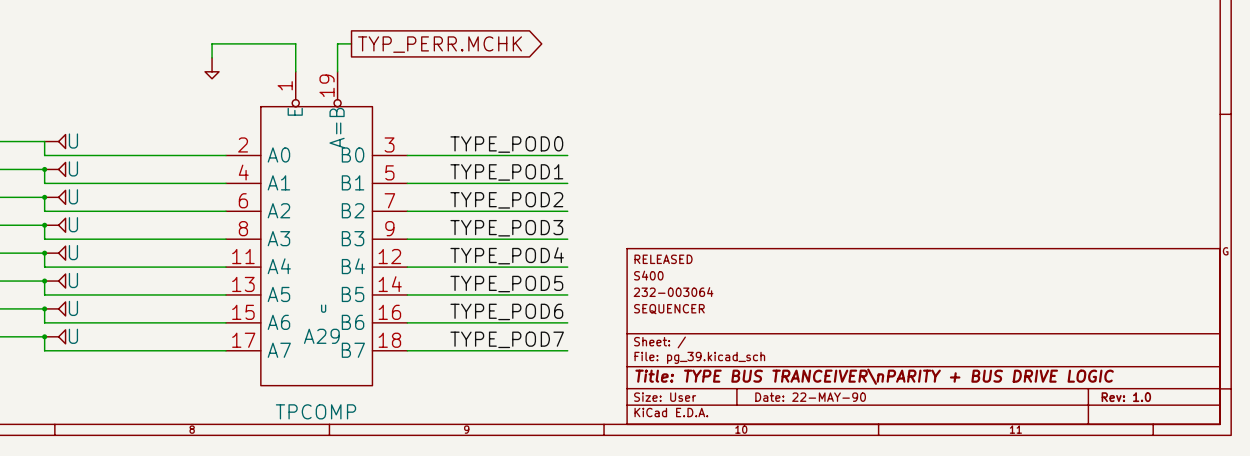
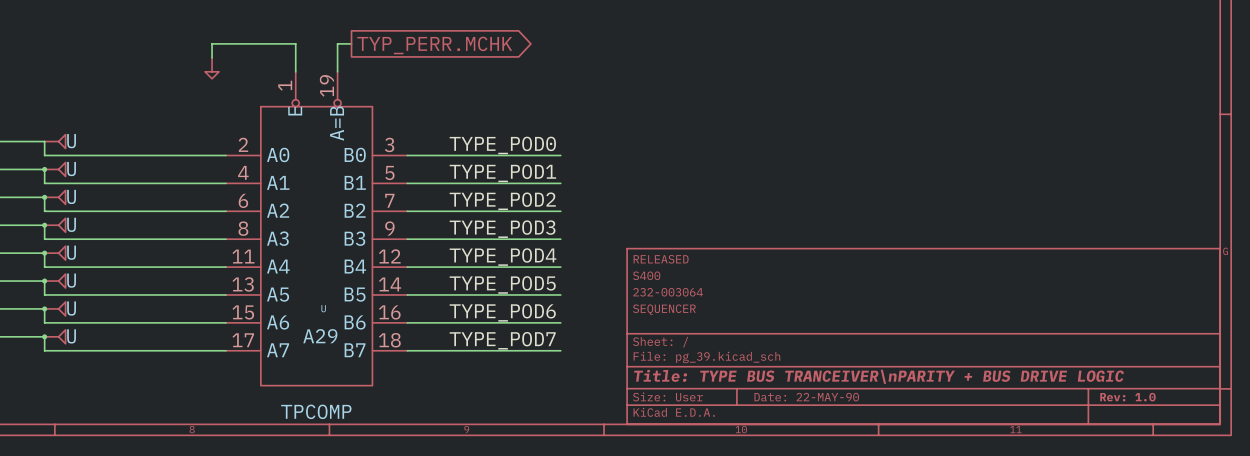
wire: (560, 155) (567, 155) -> none
wire: (560, 183) (567, 183) -> none
wire: (560, 211) (567, 211) -> none
wire: (560, 239) (567, 239) -> none
wire: (560, 267) (567, 267) -> none
wire: (560, 294) (567, 294) -> none
wire: (560, 322) (567, 322) -> none
wire: (560, 350) (567, 350) -> none

